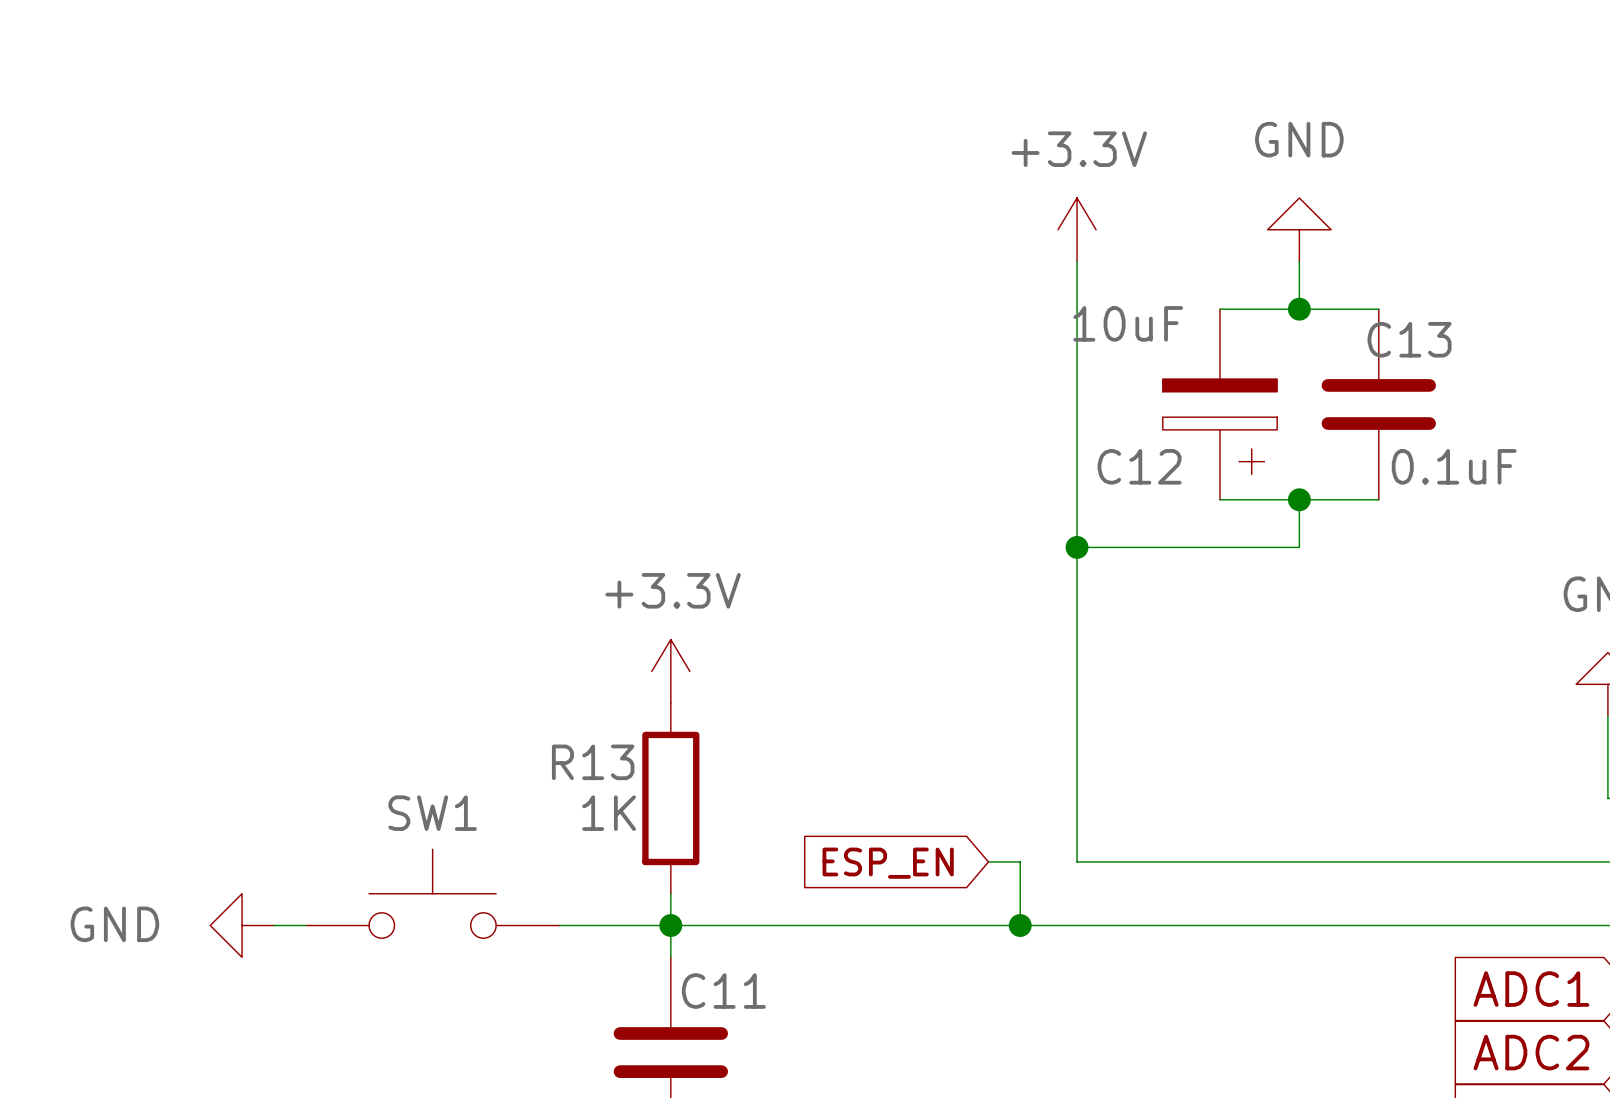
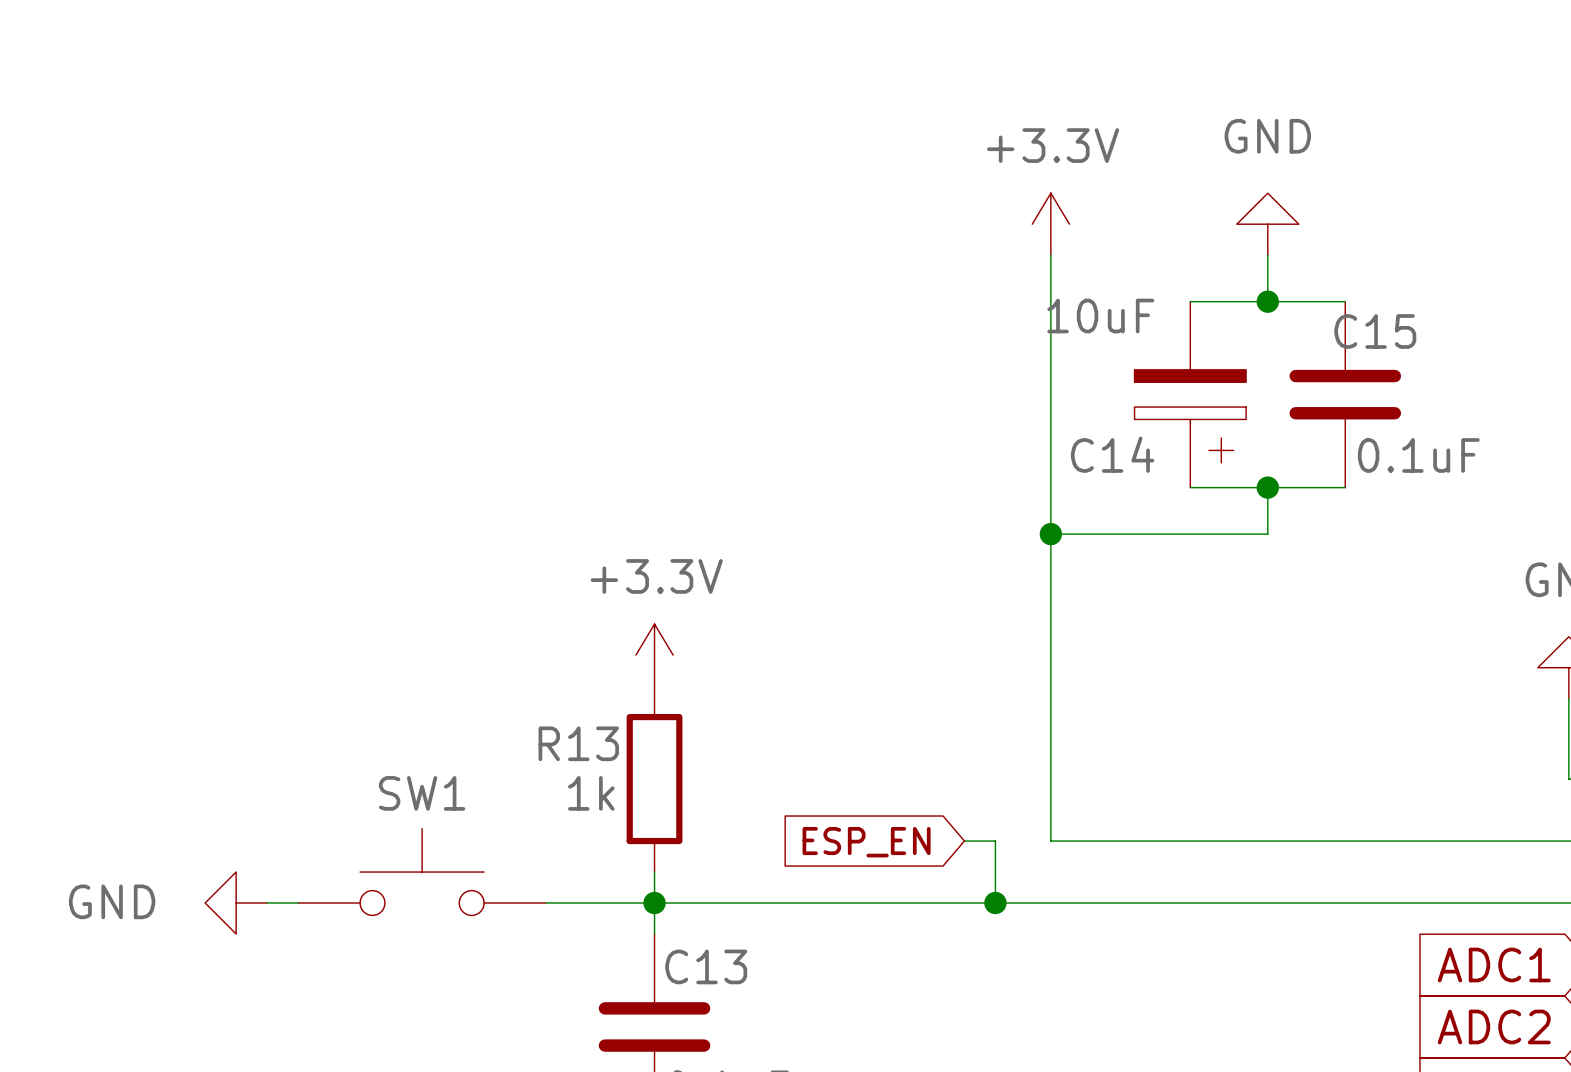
C13 name: C13 (1409, 339) -> C15 (1375, 331)
C12 name: C12 (1139, 466) -> C14 (1112, 454)
R13 value: 1K (609, 813) -> 1k (591, 793)
C11 name: C11 (723, 991) -> C13 (706, 966)

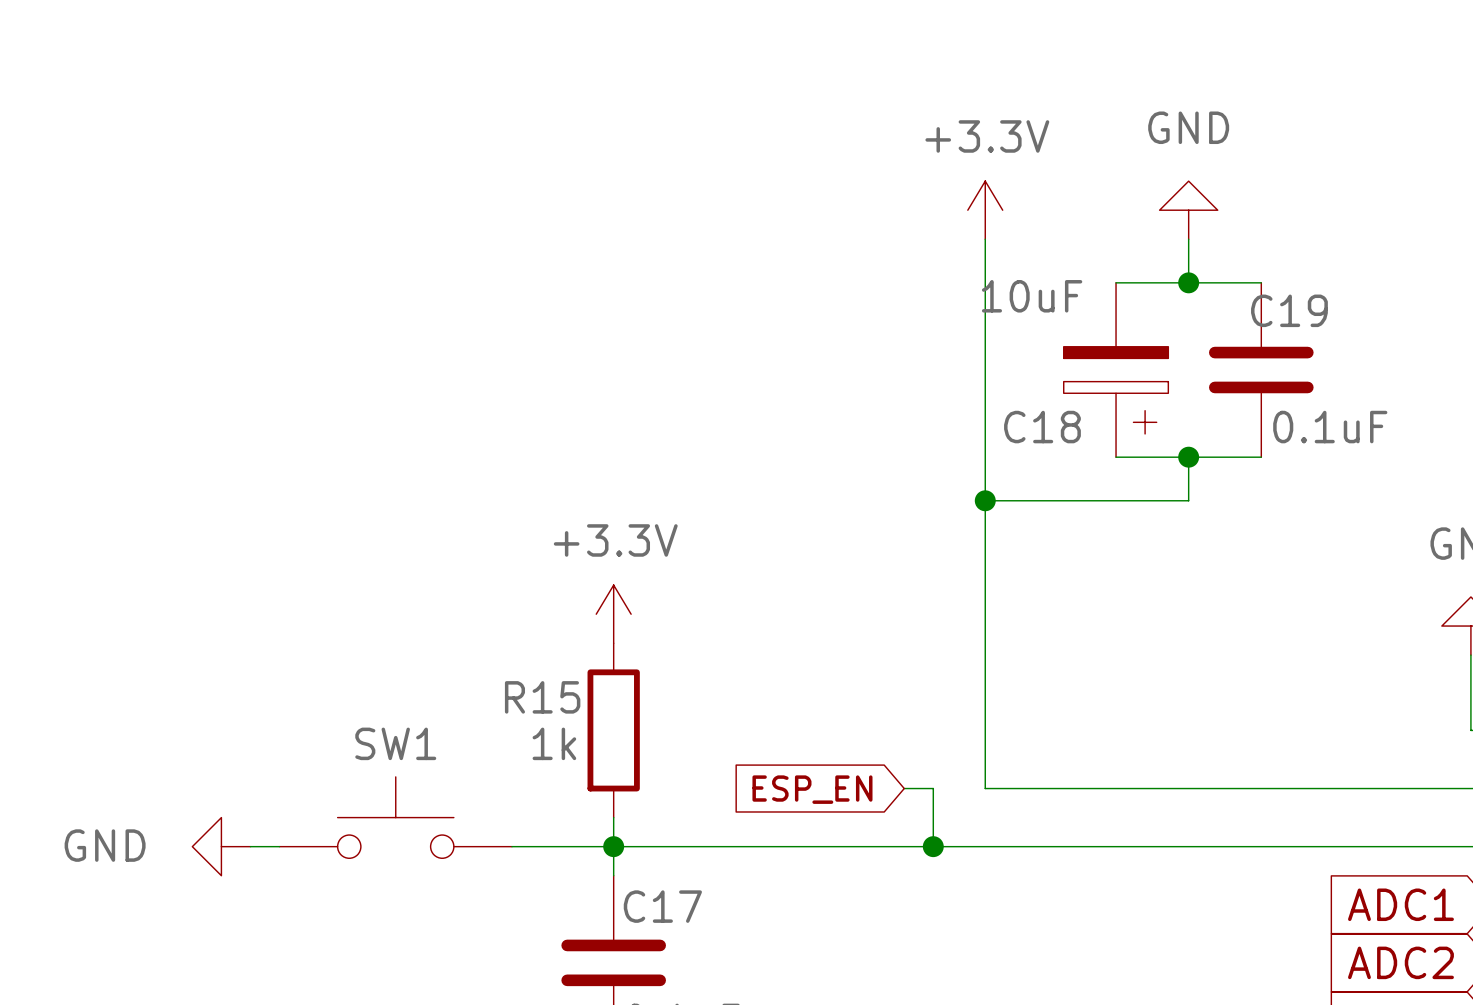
C15 name: C15 (1375, 331) -> C19 (1289, 310)
C14 name: C14 (1112, 454) -> C18 (1042, 427)
R13 name: R13 (578, 743) -> R15 (542, 697)
C13 name: C13 (706, 966) -> C17 (662, 906)

